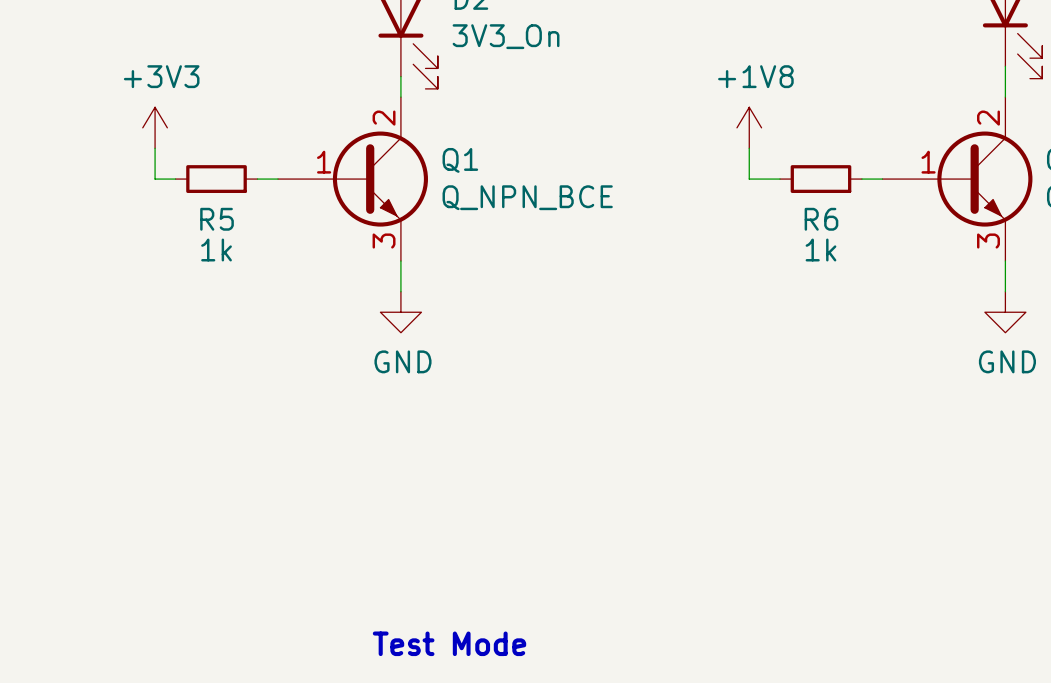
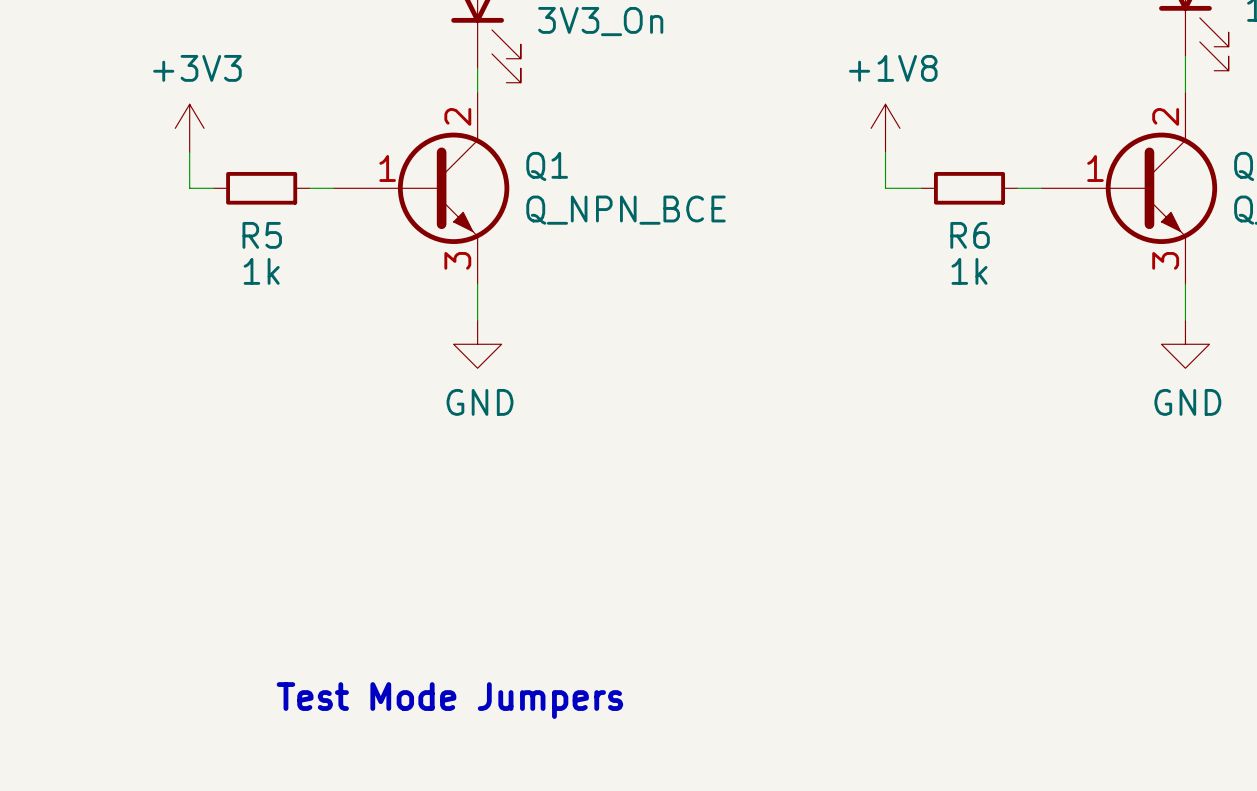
text: Test Mode (449, 643) -> Test Mode Jumpers (449, 700)

